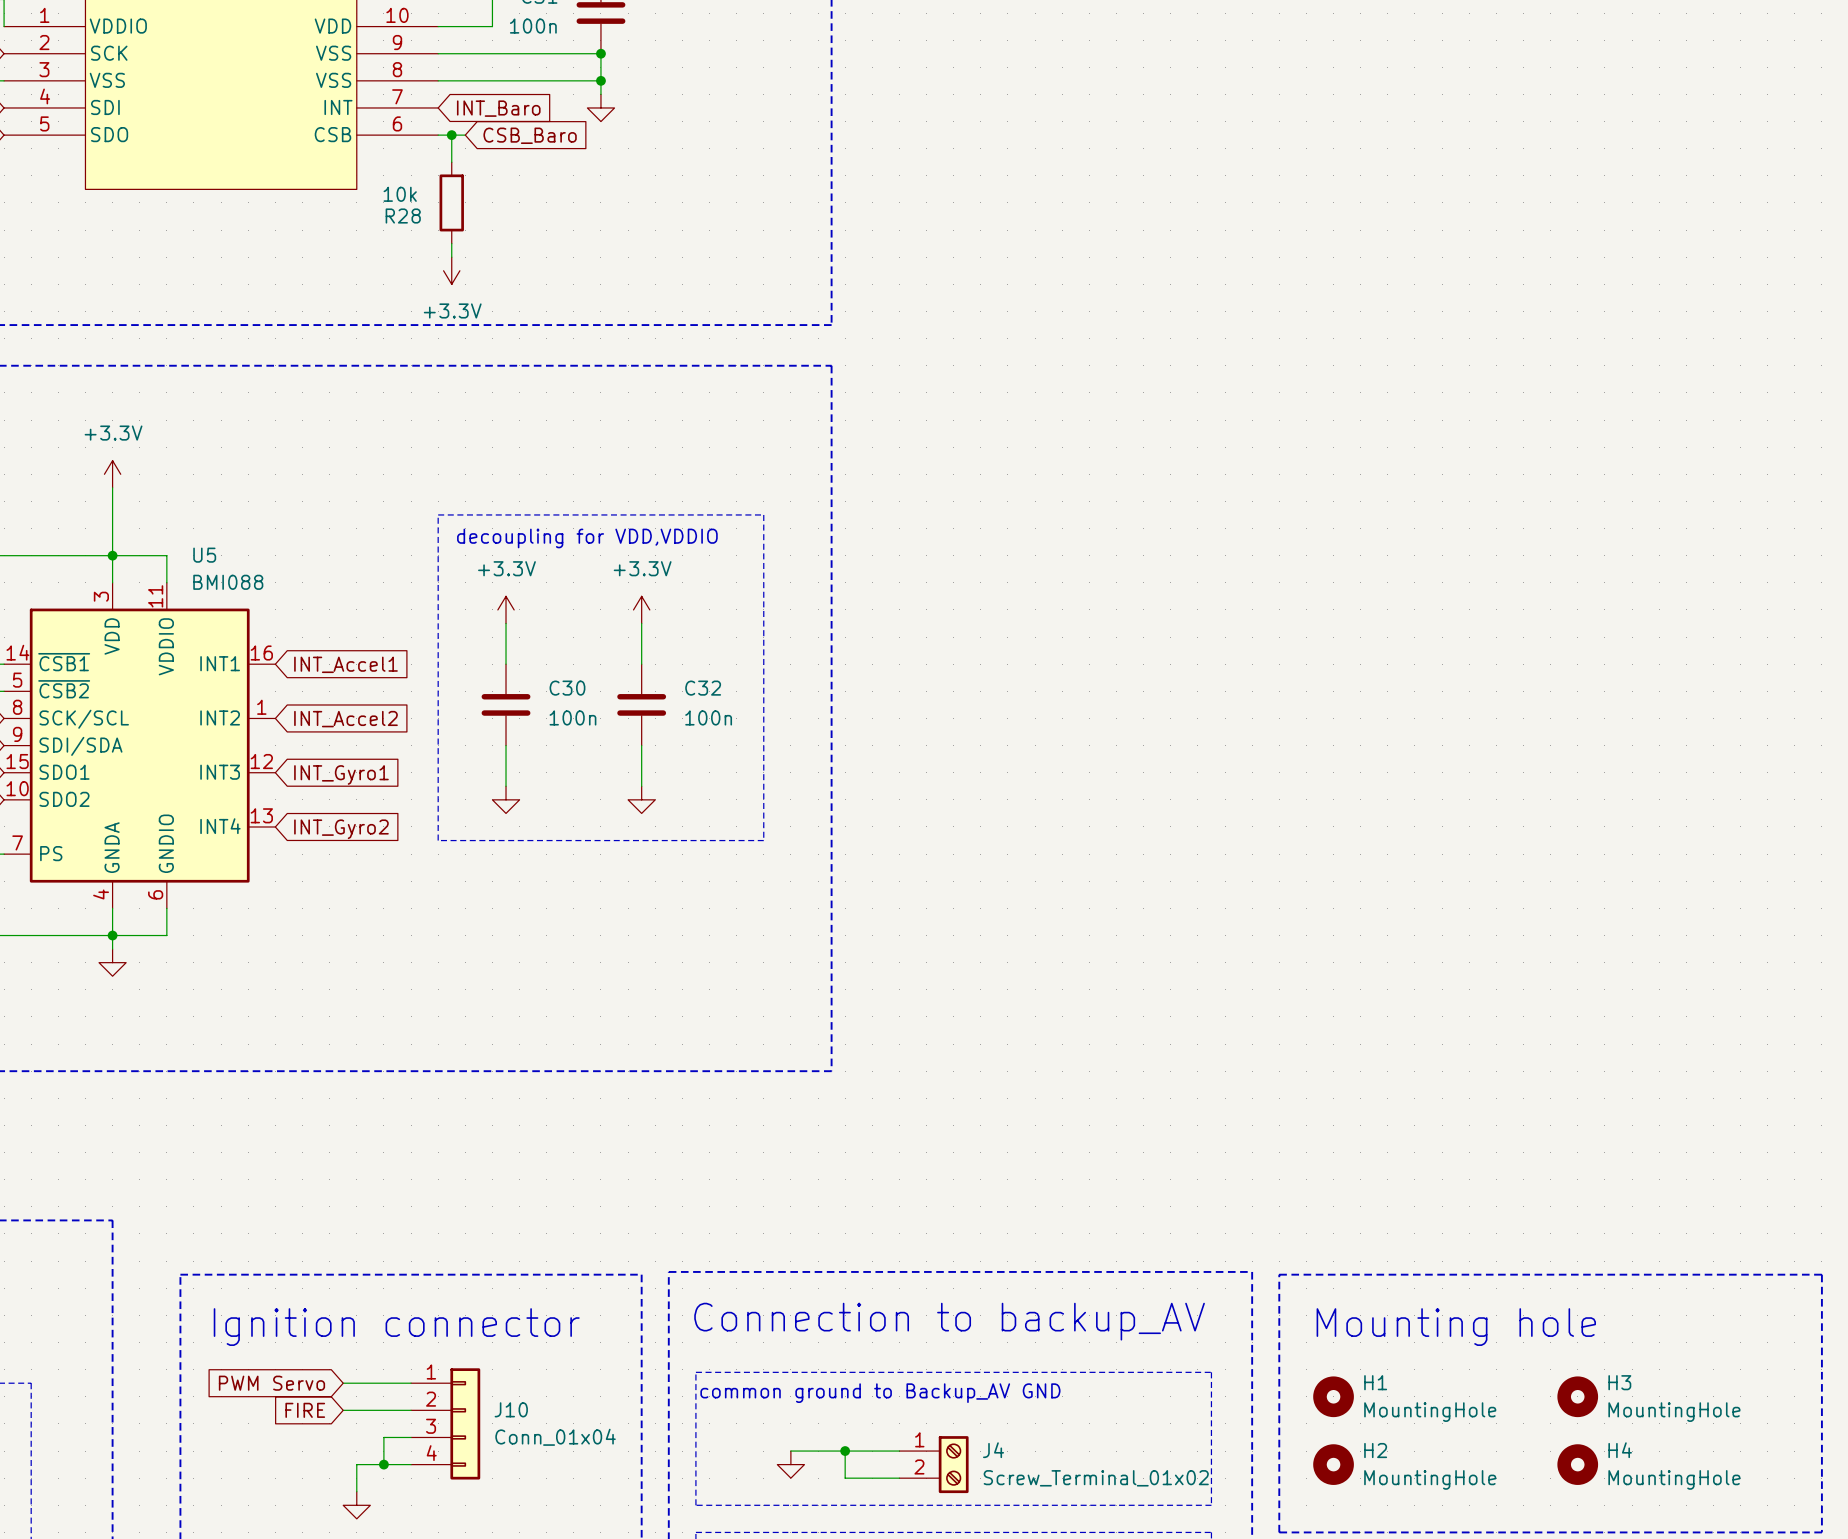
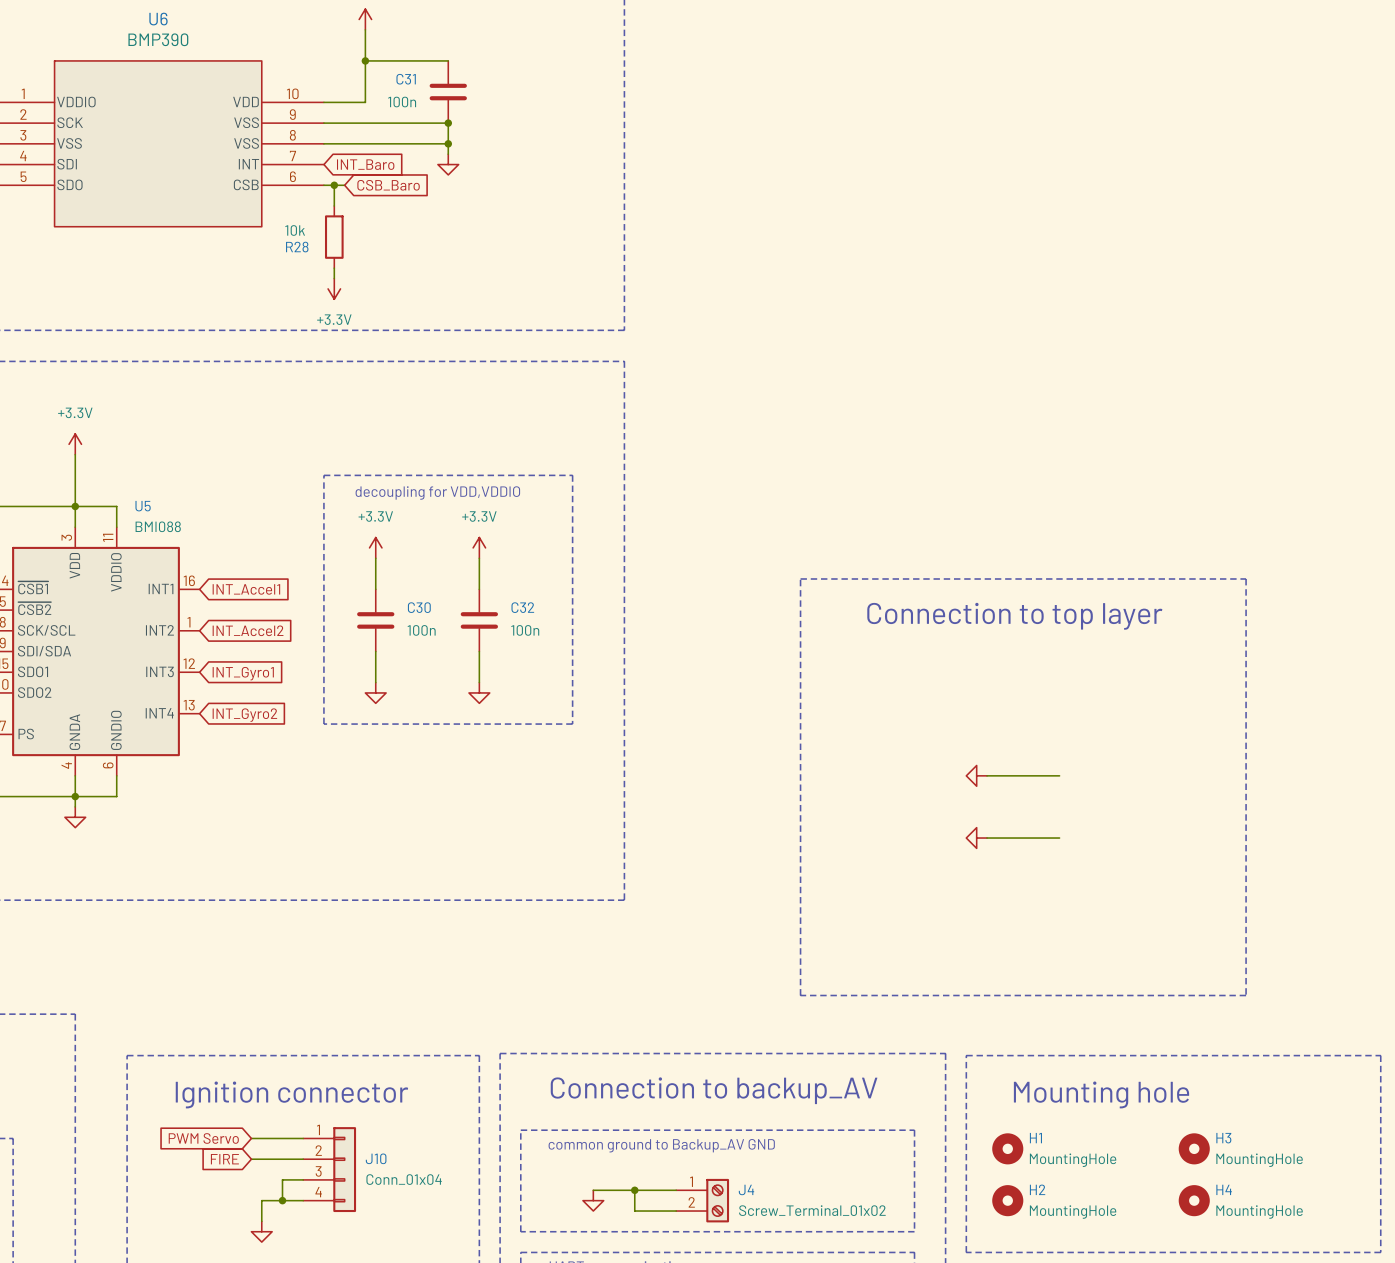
line: none -> (800, 578) (1246, 578) (1246, 995) (800, 995) (800, 578)
text: none -> Connection to top layer (1014, 616)
power symbol: none -> (976, 775)
wire: none -> (987, 775) (1059, 775)
power symbol: none -> (976, 838)
wire: none -> (987, 838) (1059, 838)

